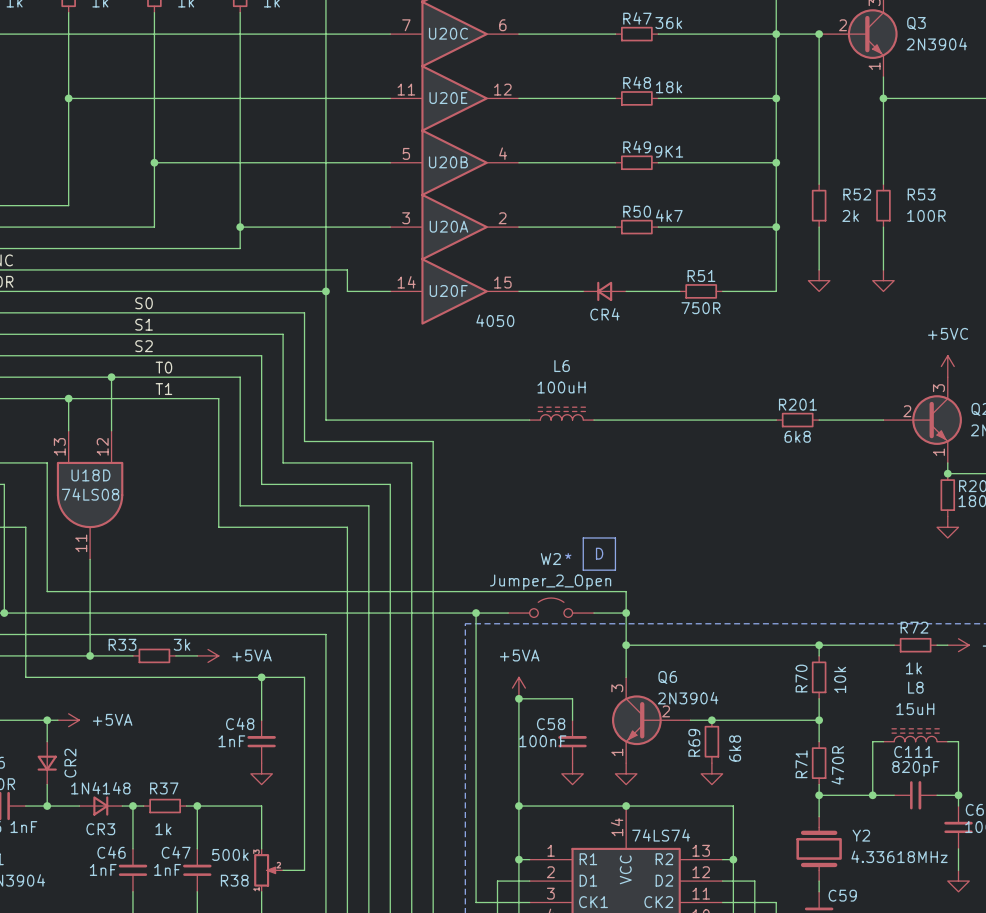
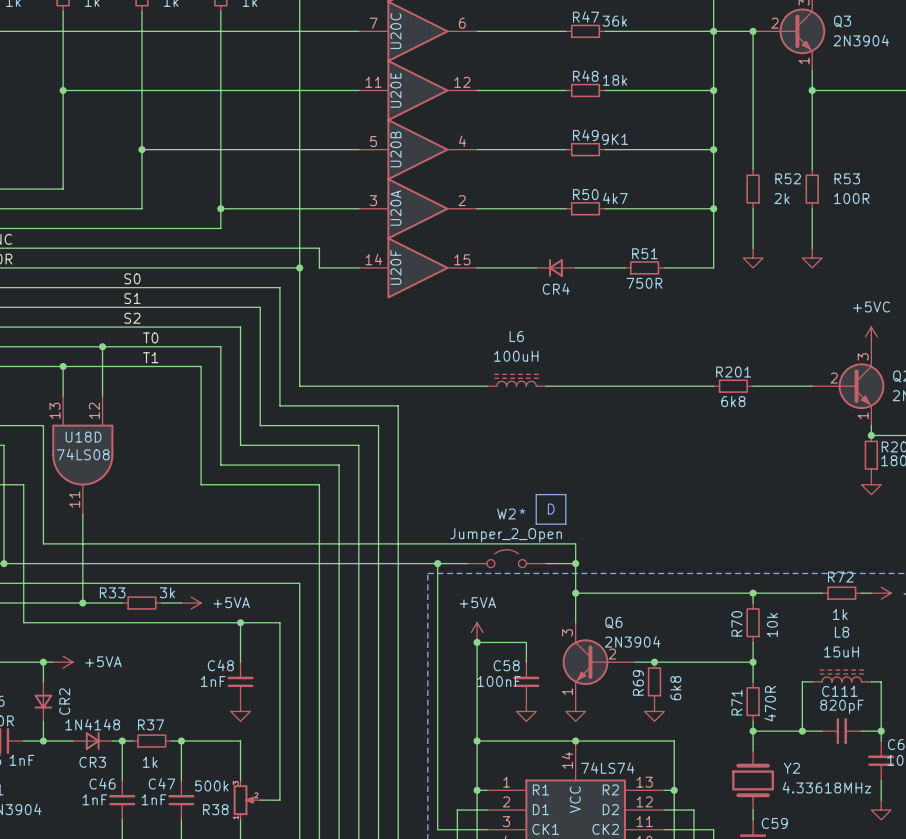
U20C name rotation: 0° (448, 33) -> 90° counterclockwise (395, 31)
U20E name rotation: 0° (448, 98) -> 90° counterclockwise (395, 90)
U20B name rotation: 0° (448, 162) -> 90° counterclockwise (395, 149)
U20A name rotation: 0° (448, 226) -> 90° counterclockwise (395, 208)
U20F name rotation: 0° (448, 291) -> 90° counterclockwise (395, 267)
U20F value: 4050 (495, 320) -> none

